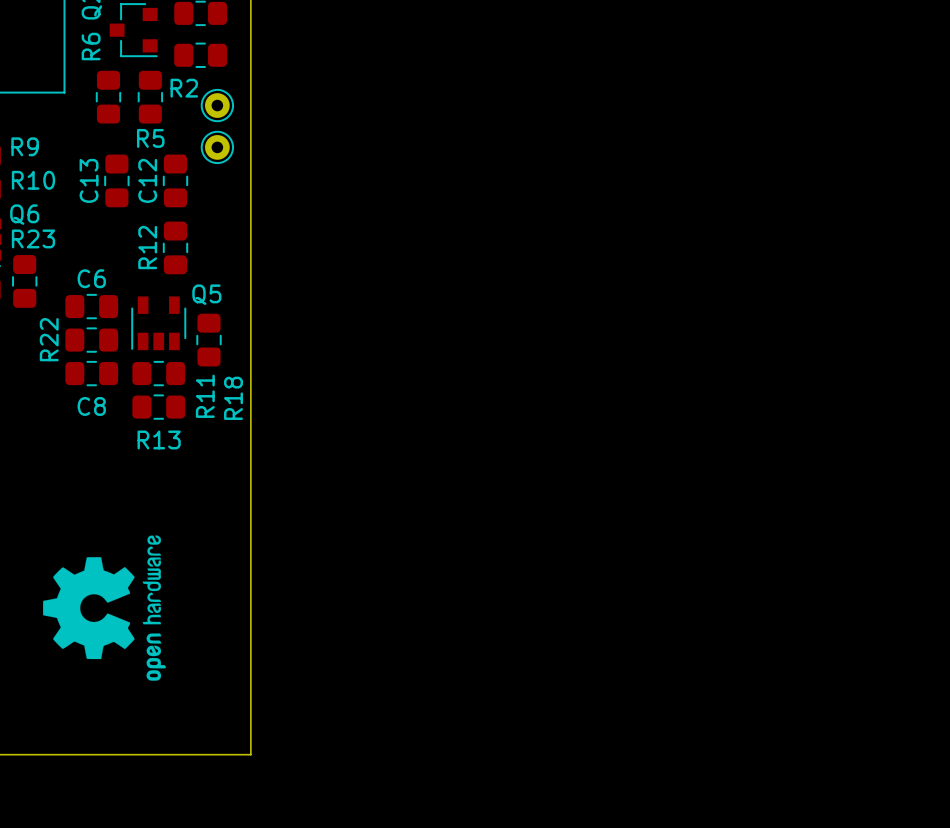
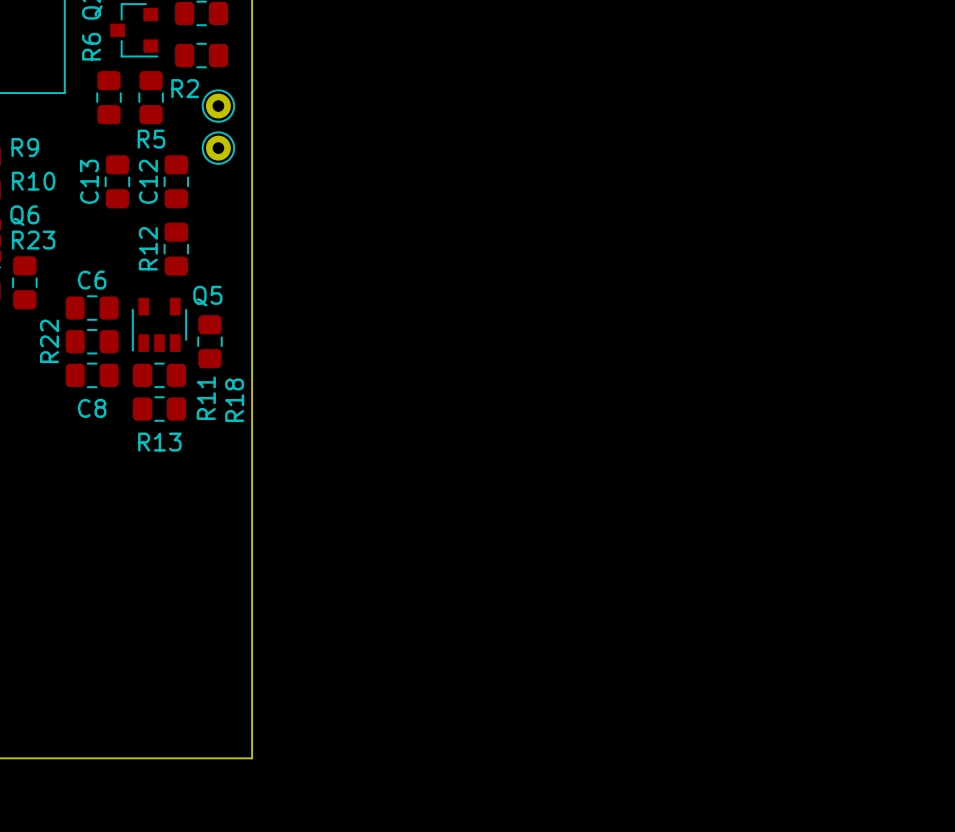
drawing: [43, 535, 166, 681] -> none

